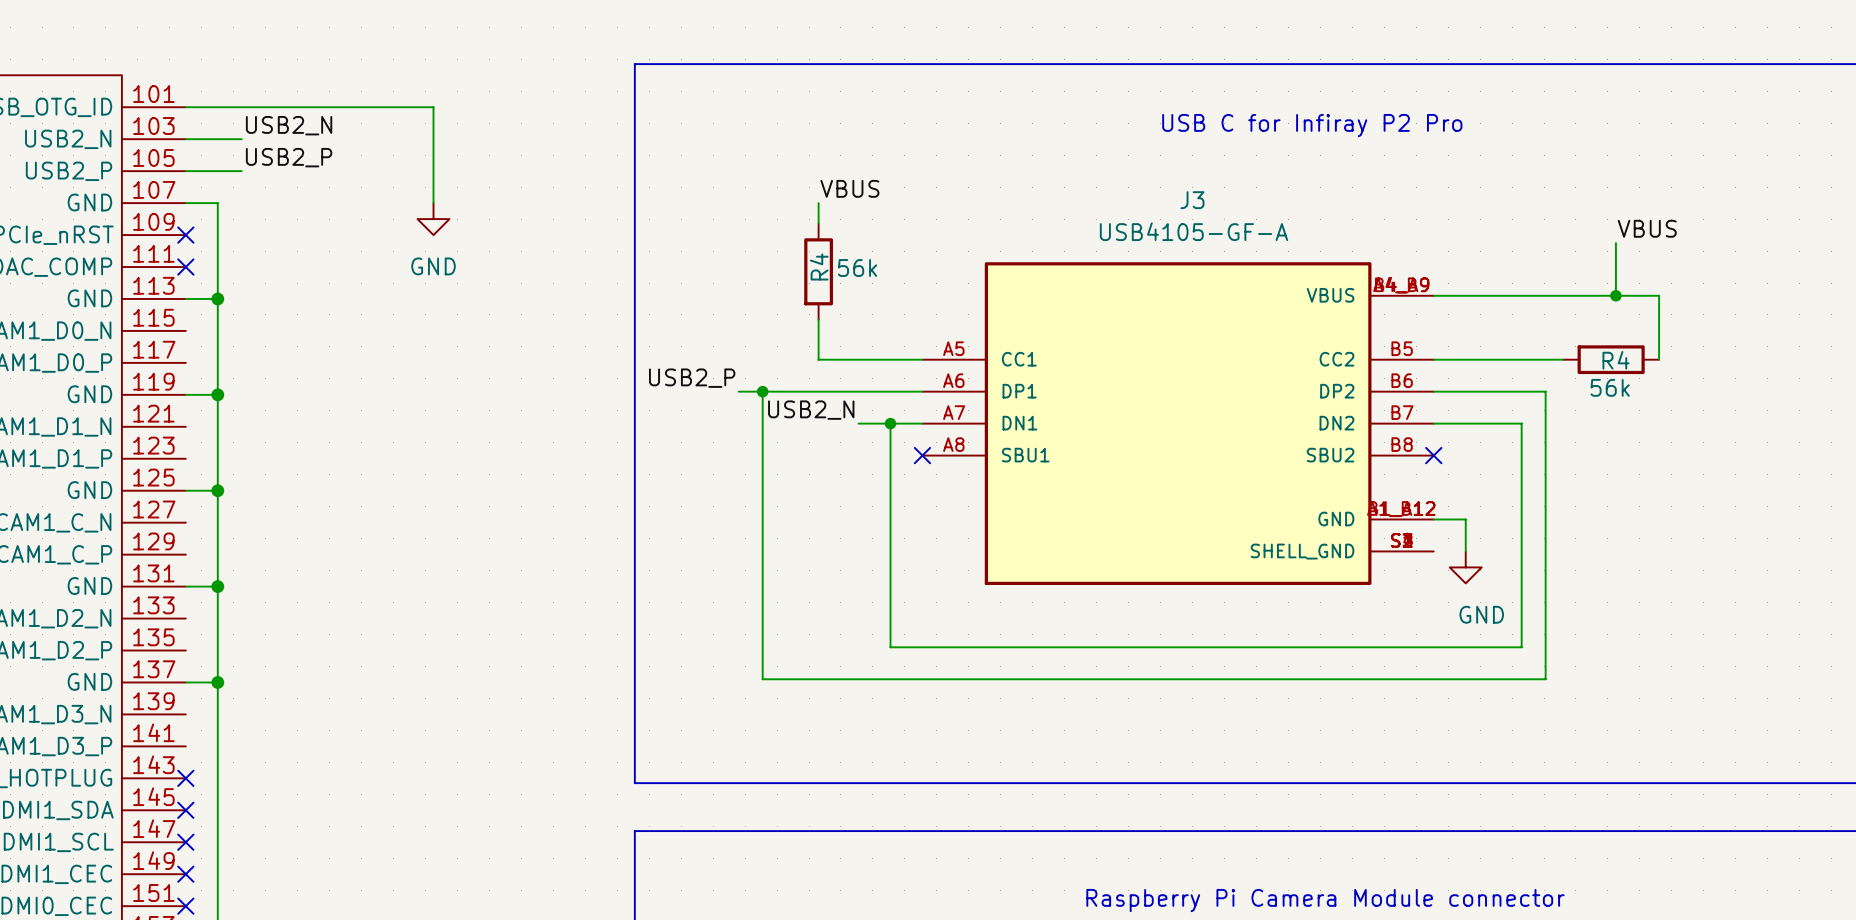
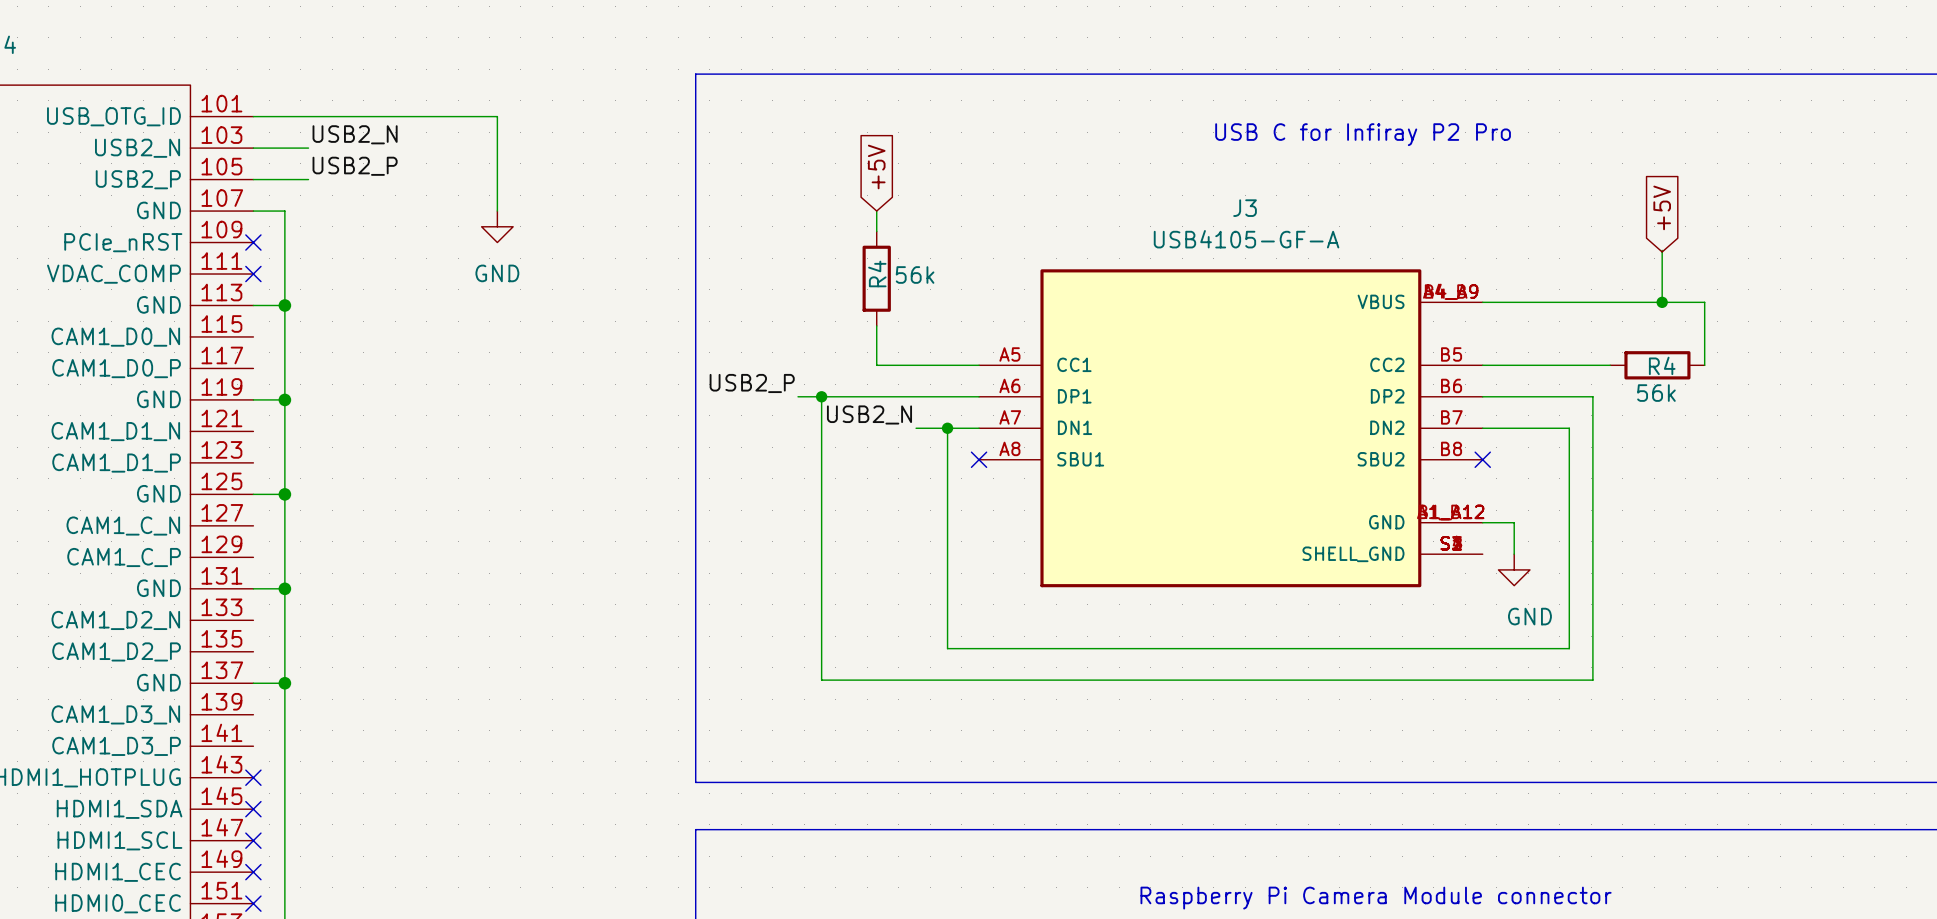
global label: none -> +5V (876, 166)
label: VBUS (849, 188) -> none
global label: none -> +5V (1662, 207)
label: VBUS (1647, 228) -> none

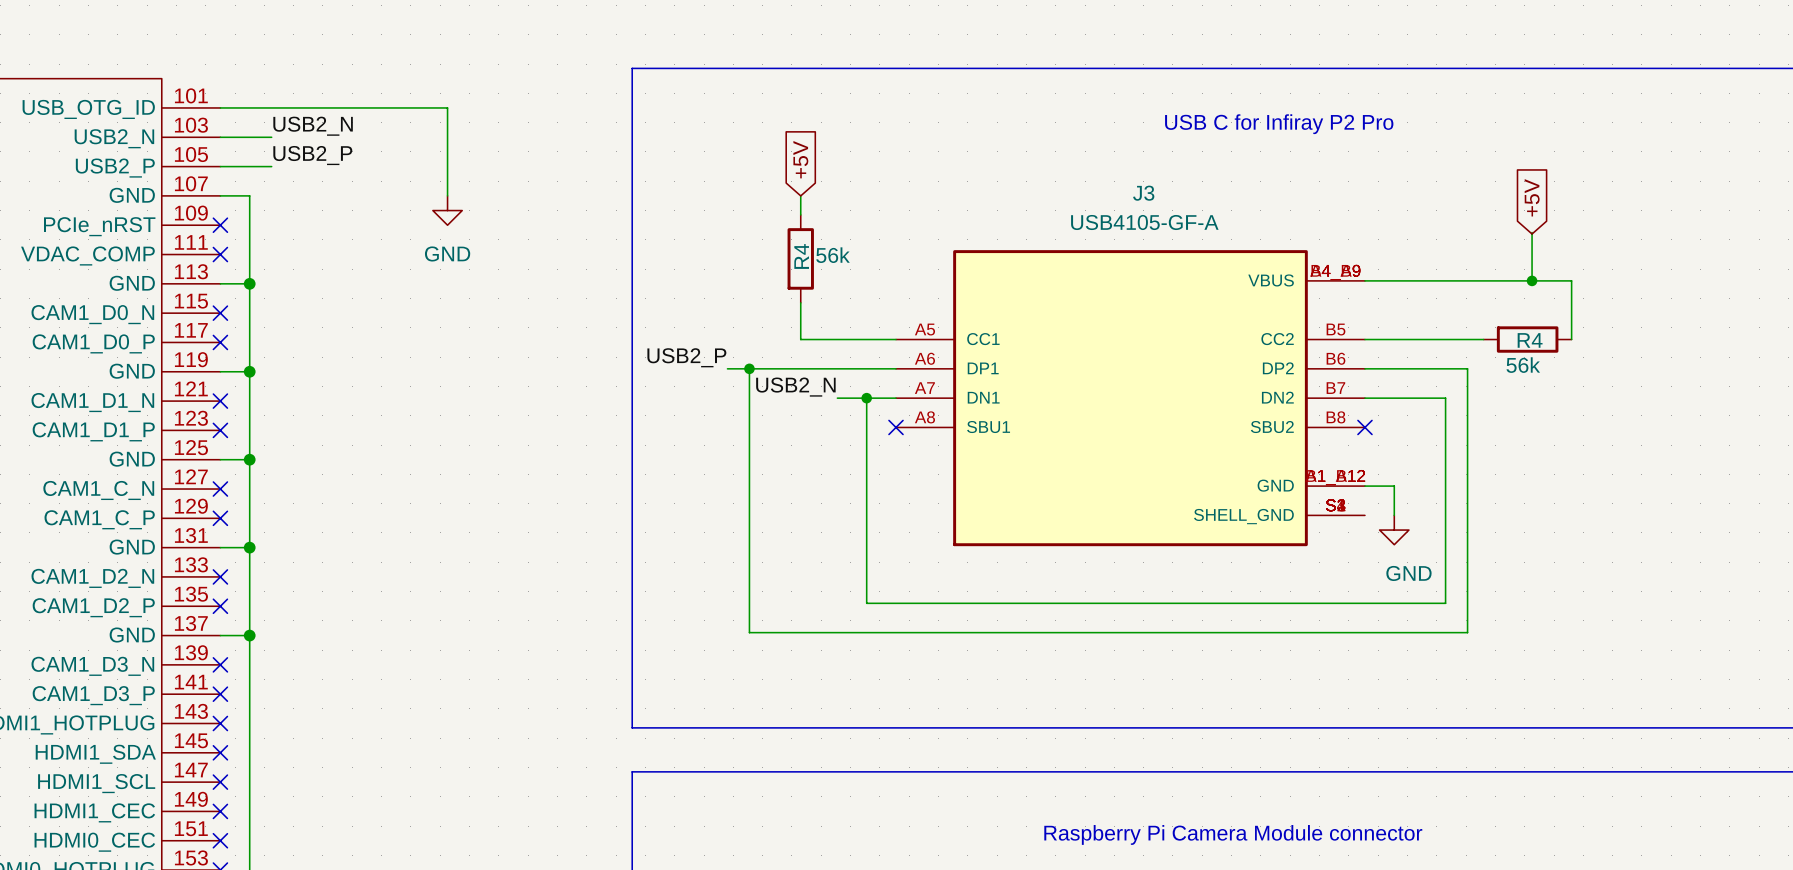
no-connect mark: none -> (220, 313)
no-connect mark: none -> (220, 342)
no-connect mark: none -> (220, 401)
no-connect mark: none -> (220, 430)
no-connect mark: none -> (220, 489)
no-connect mark: none -> (220, 518)
no-connect mark: none -> (220, 576)
no-connect mark: none -> (220, 606)
no-connect mark: none -> (220, 664)
no-connect mark: none -> (220, 694)

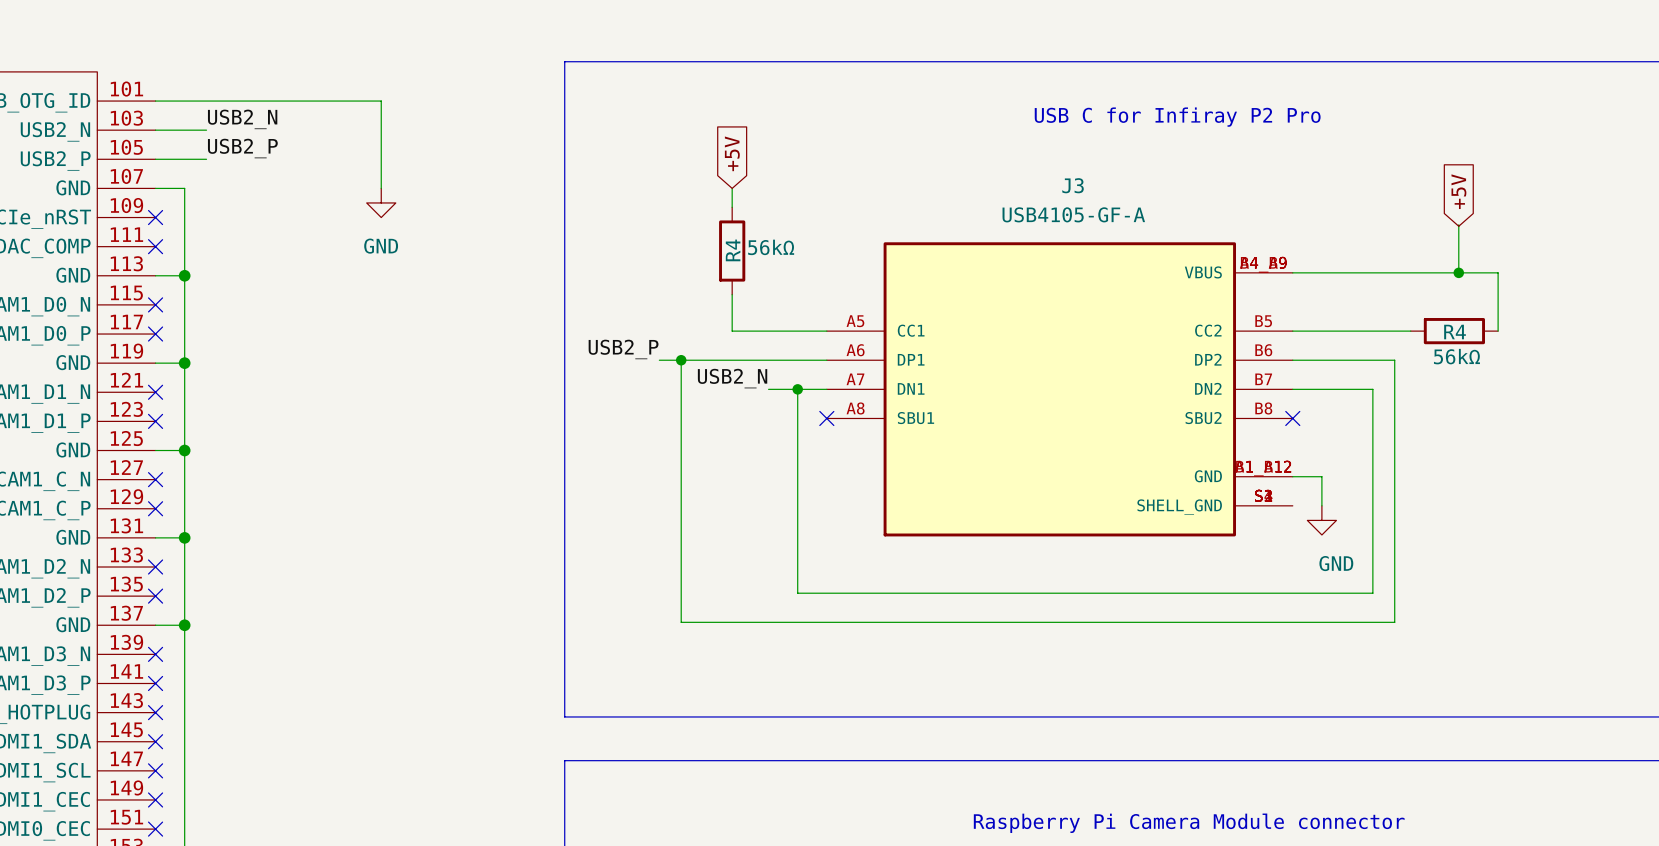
R4 value: 56k (833, 255) -> 56kΩ (771, 247)
R4 value: 56k (1523, 365) -> 56kΩ (1456, 356)

